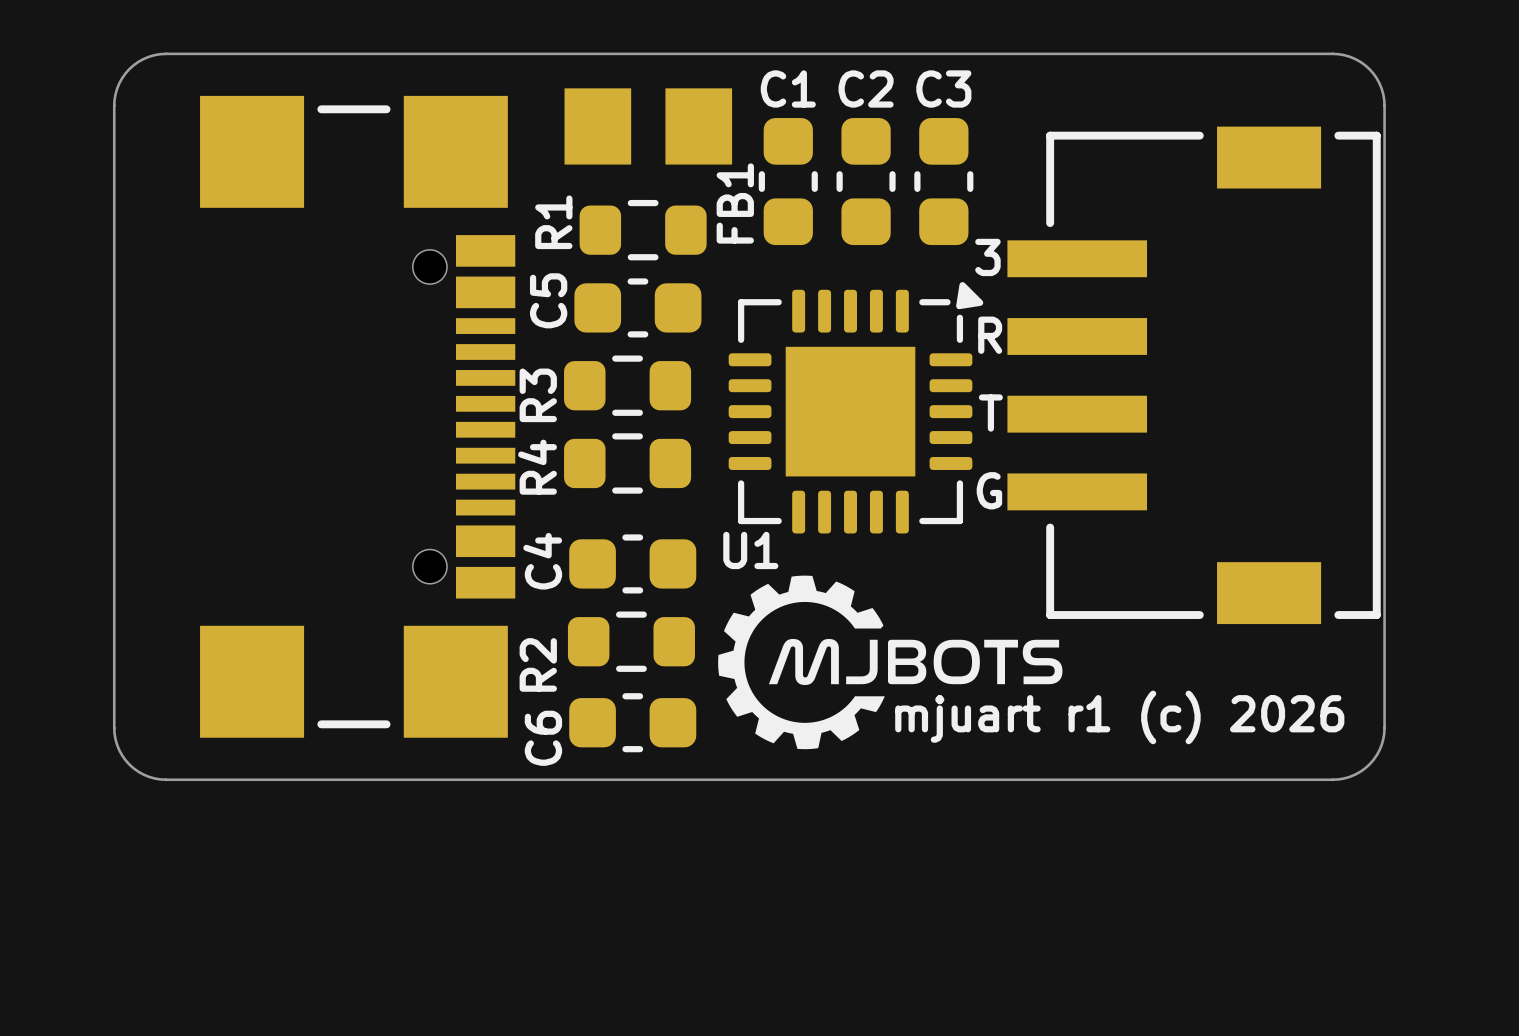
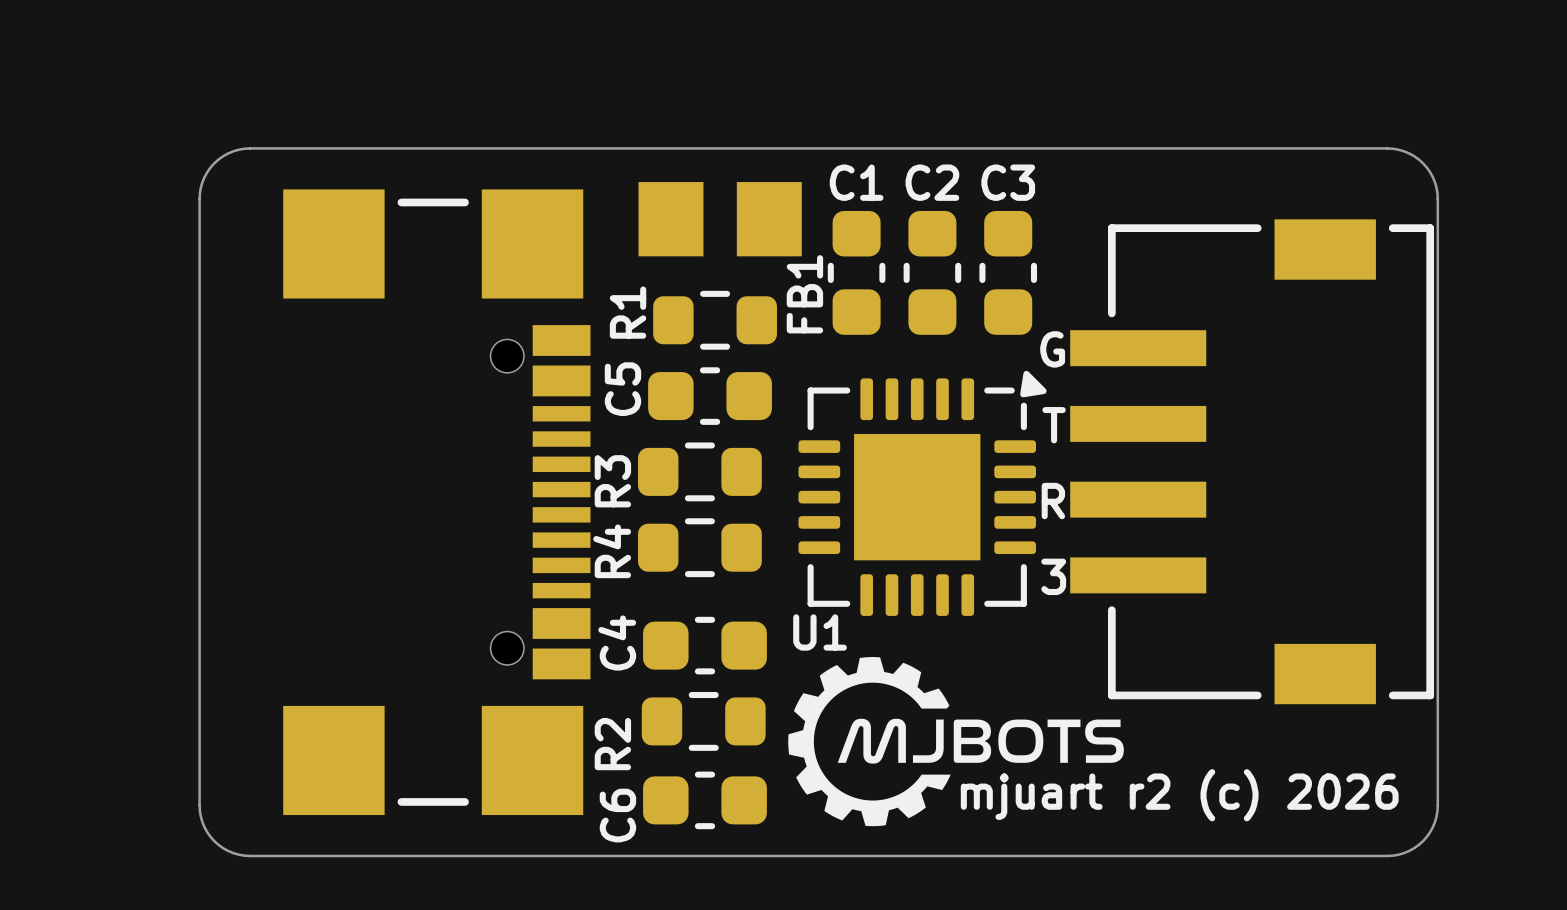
text: 3 (987, 257) -> G (1052, 349)
text: R (990, 335) -> T (1054, 425)
text: T (990, 413) -> R (1053, 501)
text: G (989, 490) -> 3 (1053, 576)
text: mjuart r1 (c) 2026 (1119, 717) -> mjuart r2 (c) 2026 (1179, 795)

